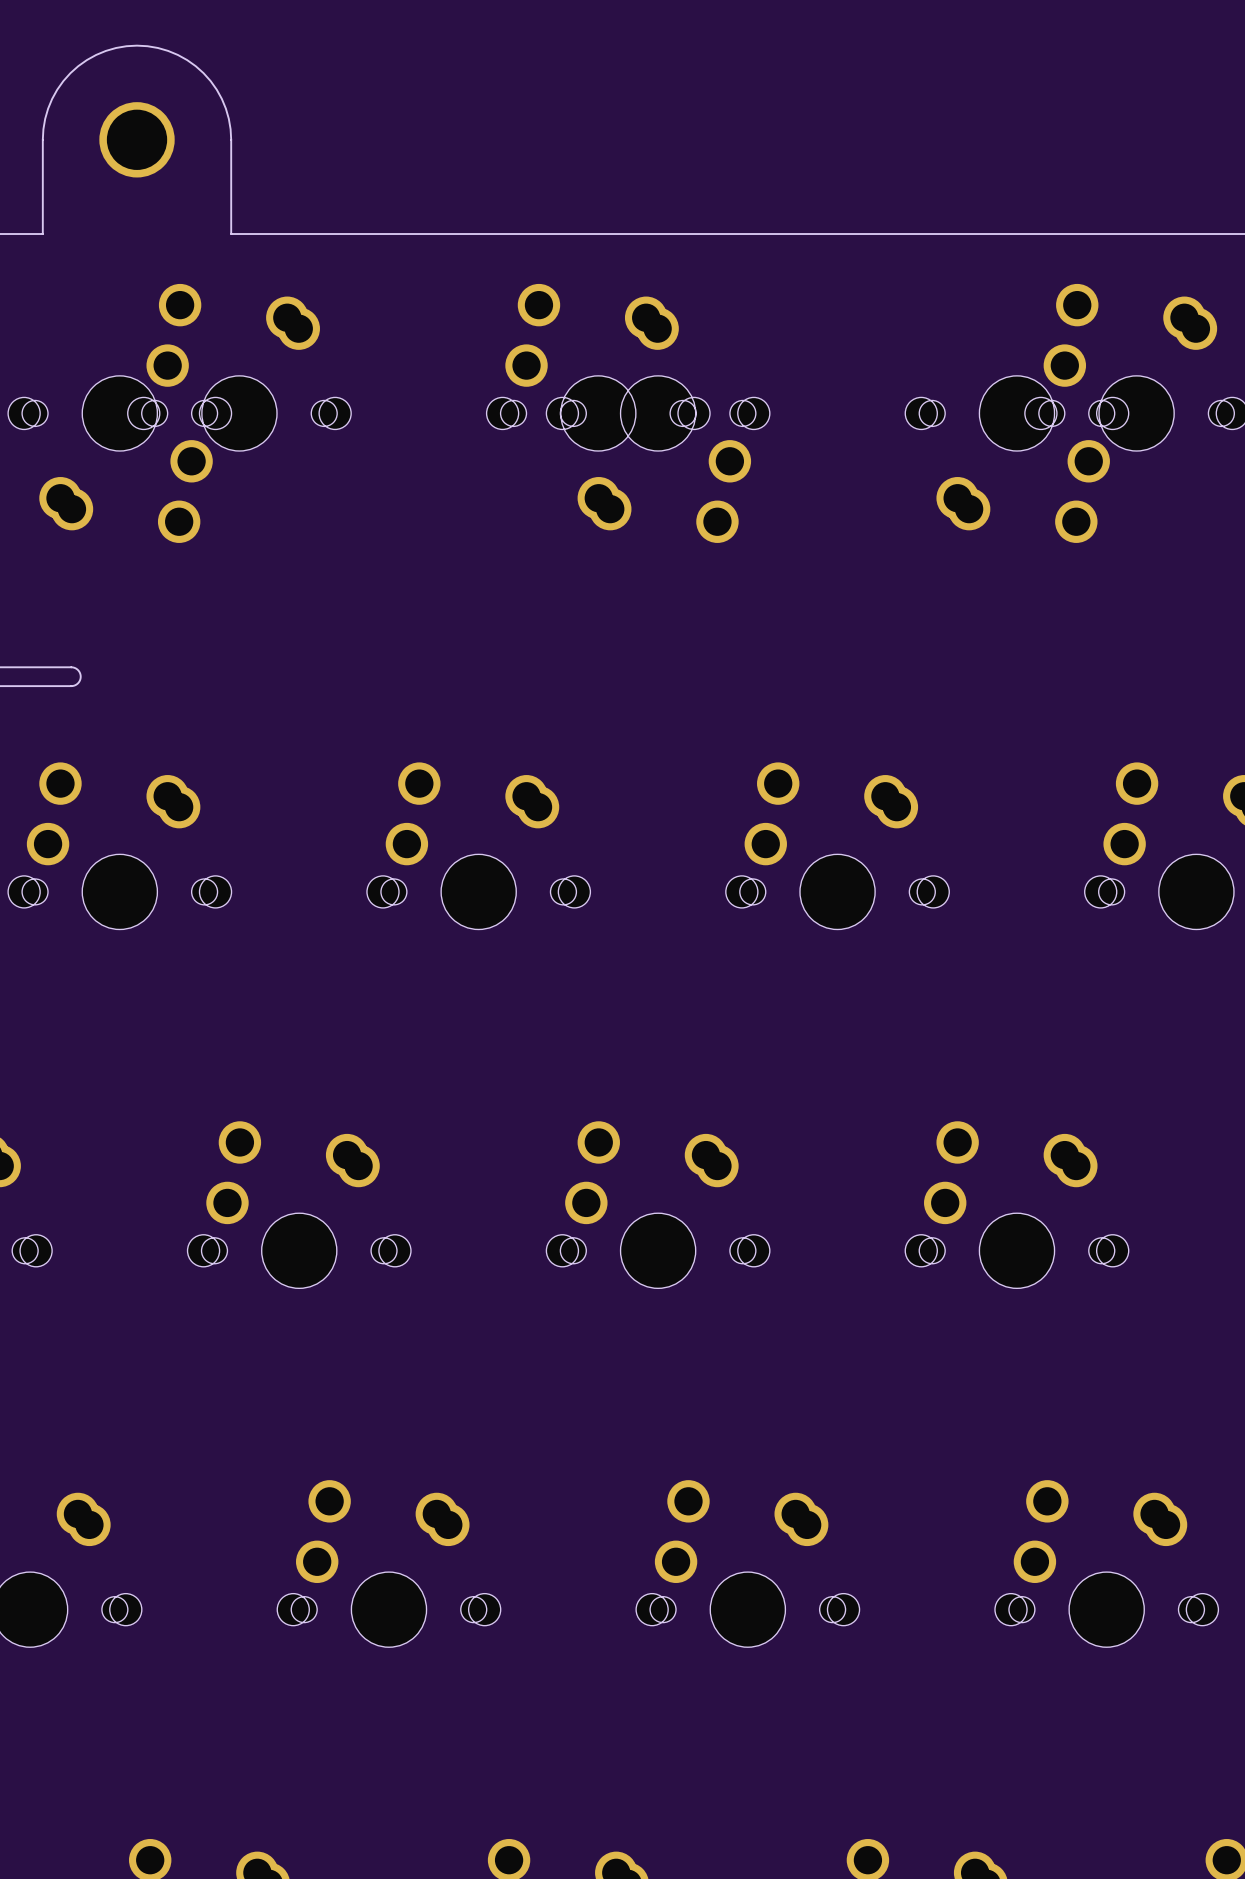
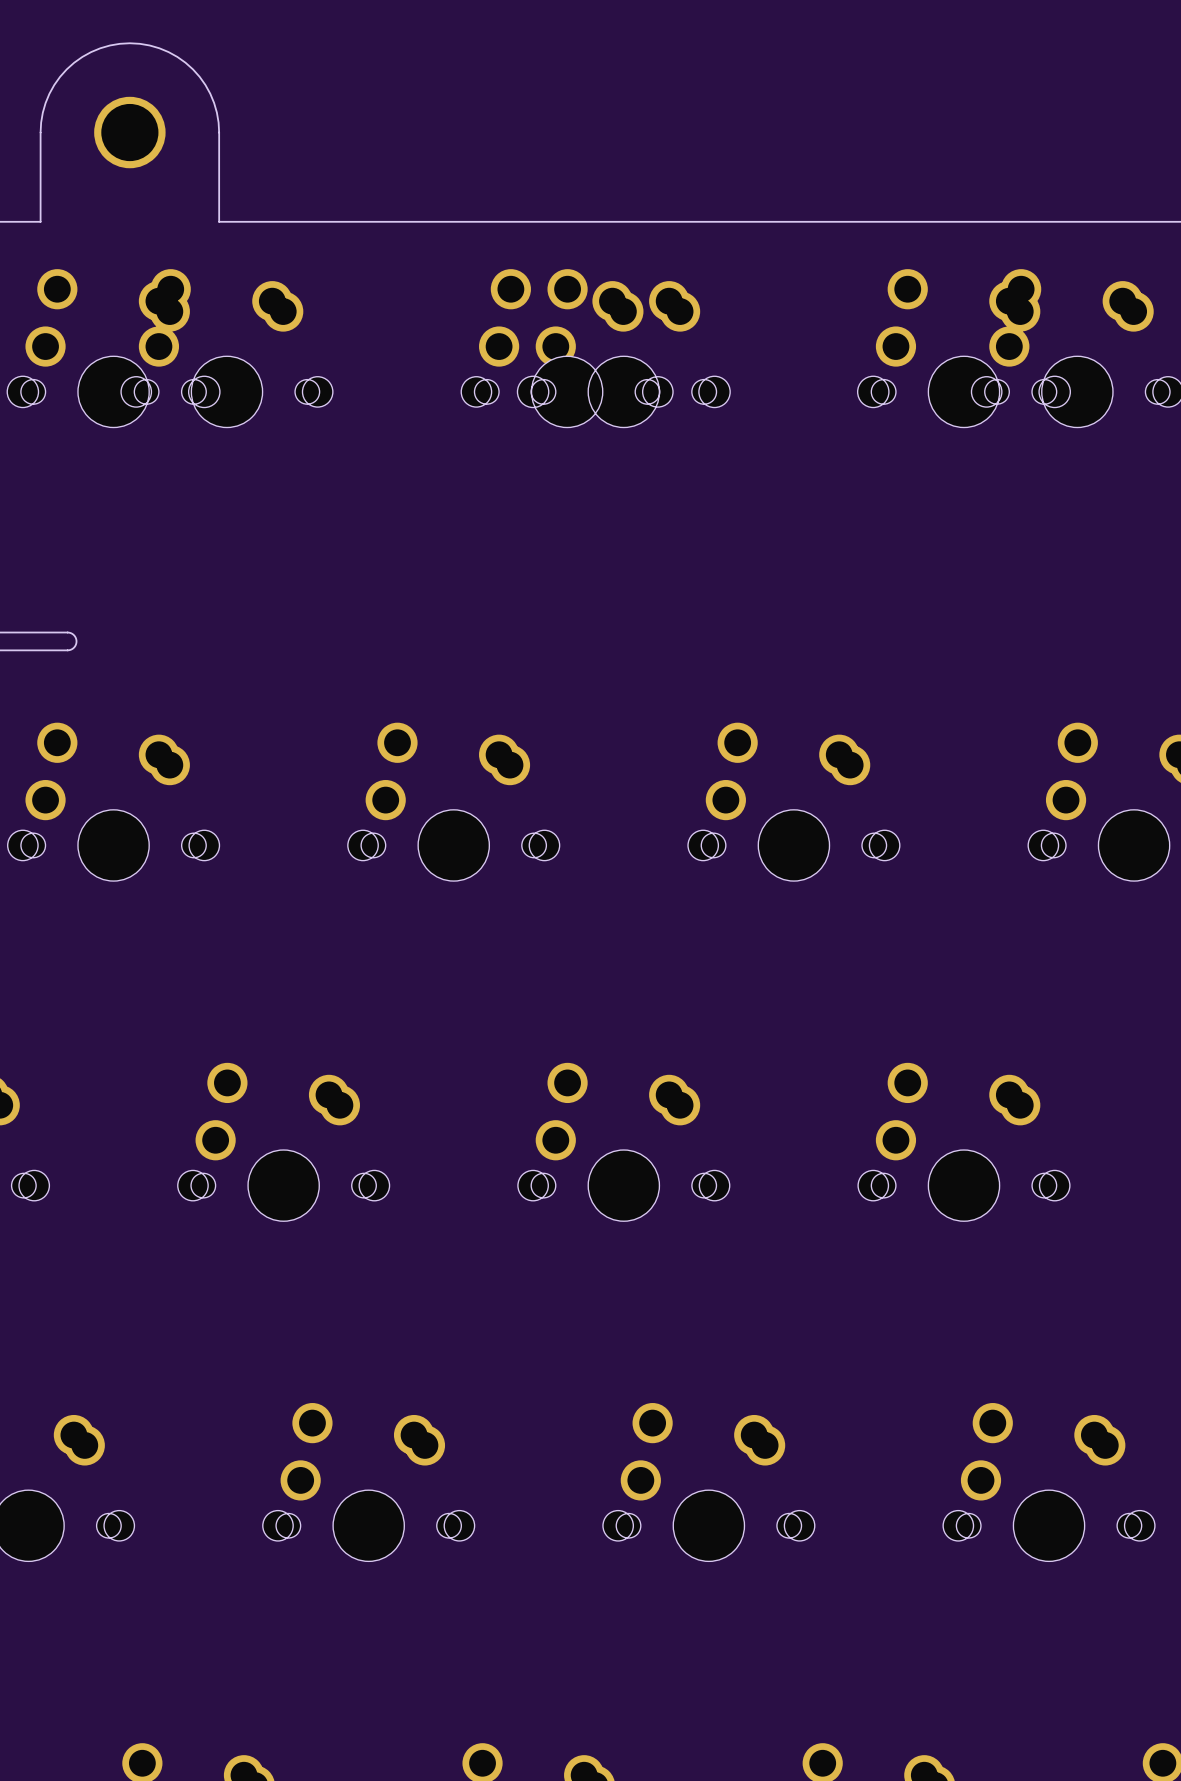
part: none -> (113, 348)
part: none -> (623, 348)
part: none -> (963, 348)
part: (119, 459) -> none
part: (658, 459) -> none
part: (1016, 459) -> none

